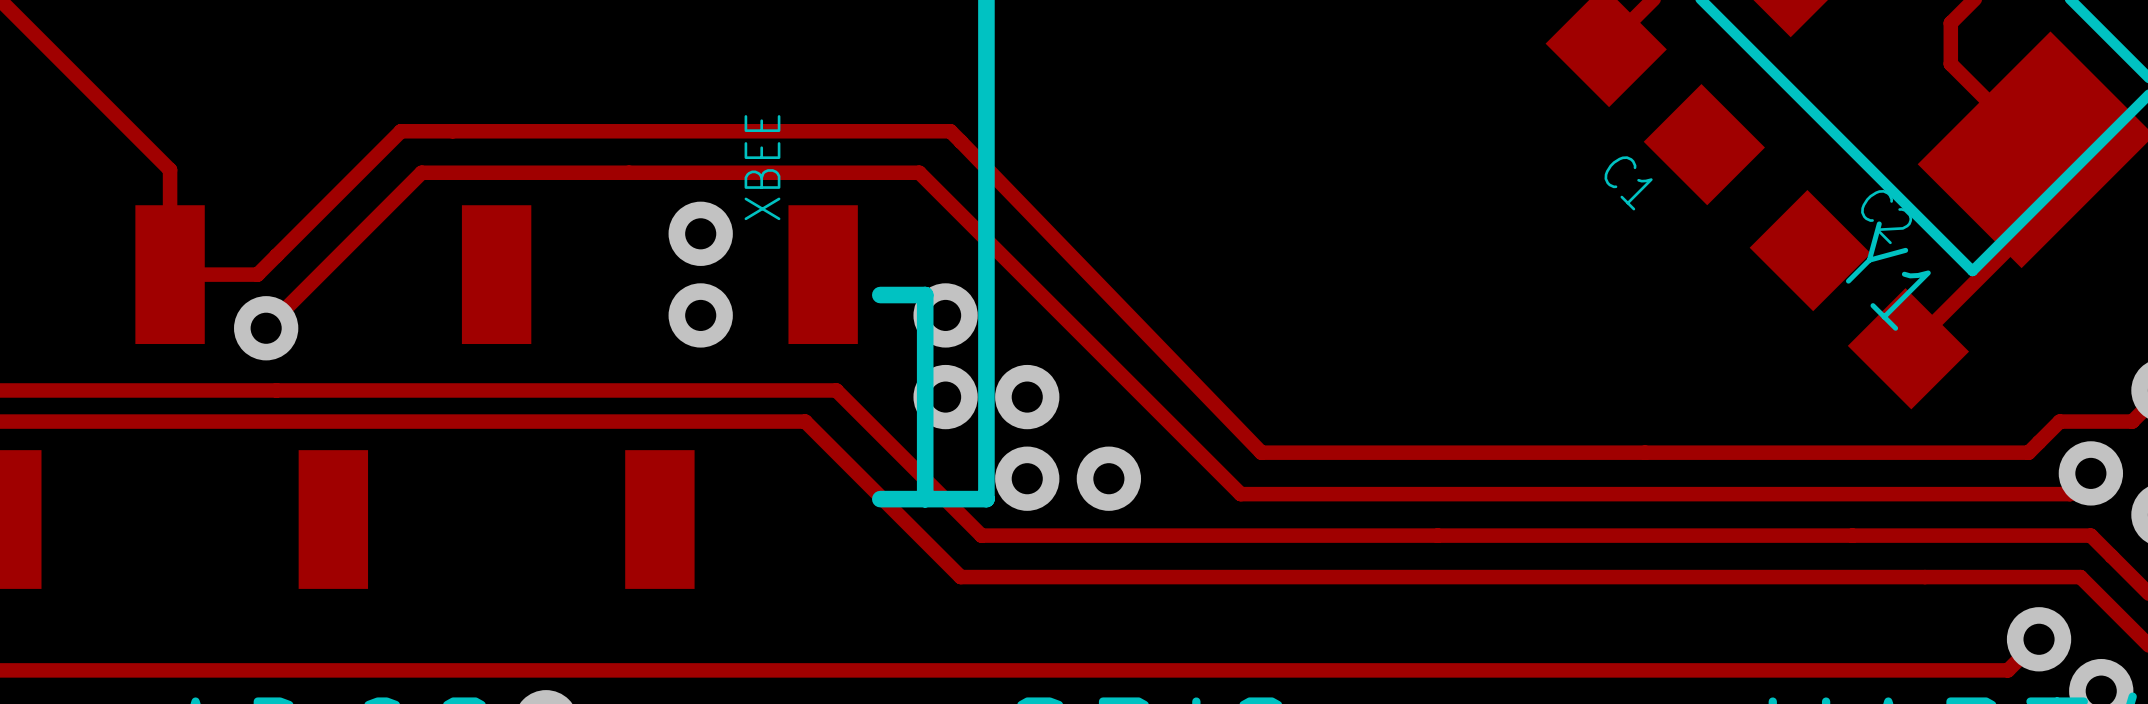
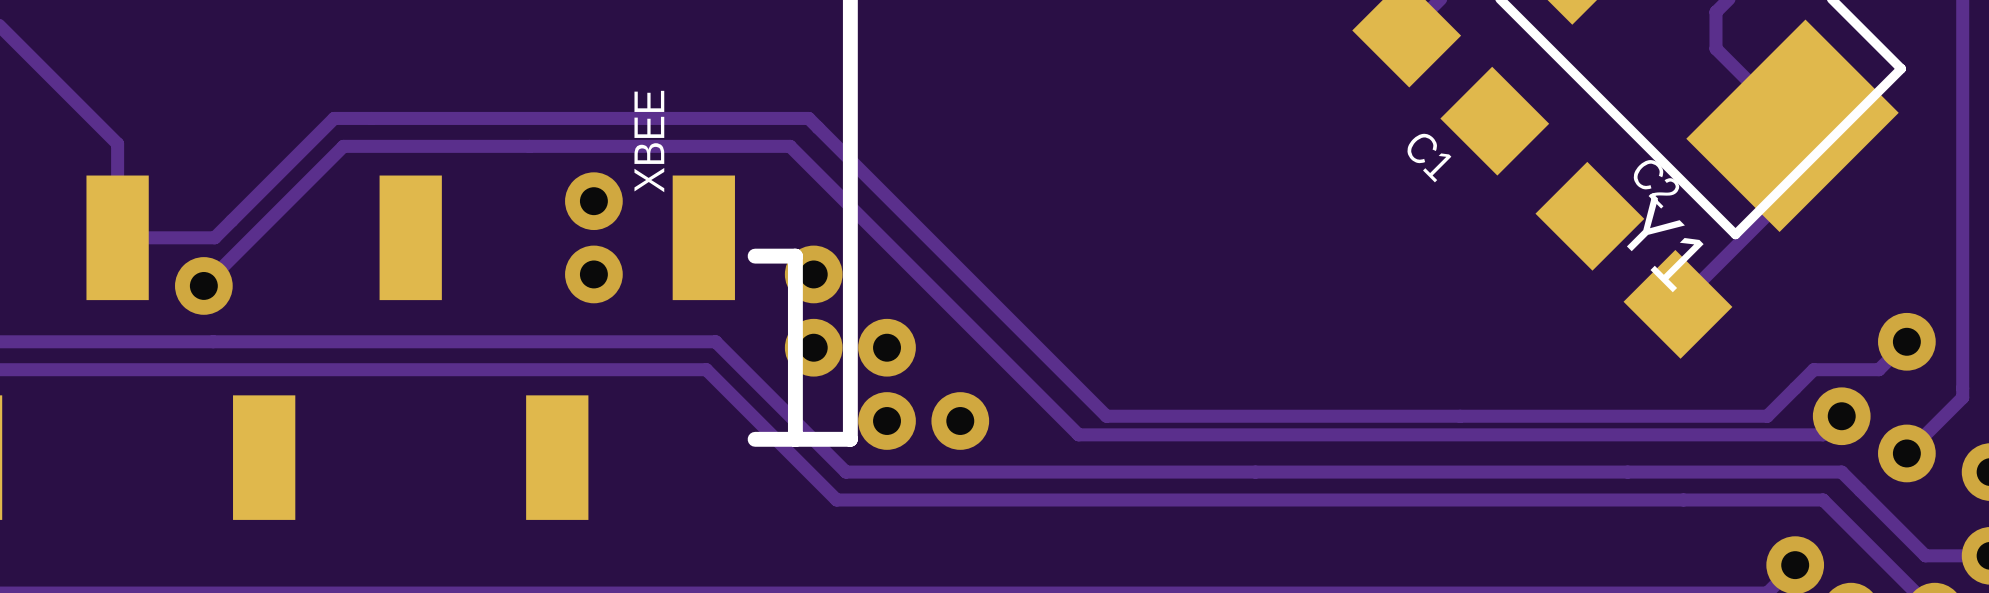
track: (257, 274) (400, 131) (950, 131) (1261, 452) (2028, 452) -> (196, 237) (214, 237) (334, 118) (808, 118) (1106, 416) (1767, 416) (1785, 397)
track: (805, 421) (960, 577) (2080, 577) -> (687, 369) (706, 369) (836, 499) (1823, 499) (1832, 509)

